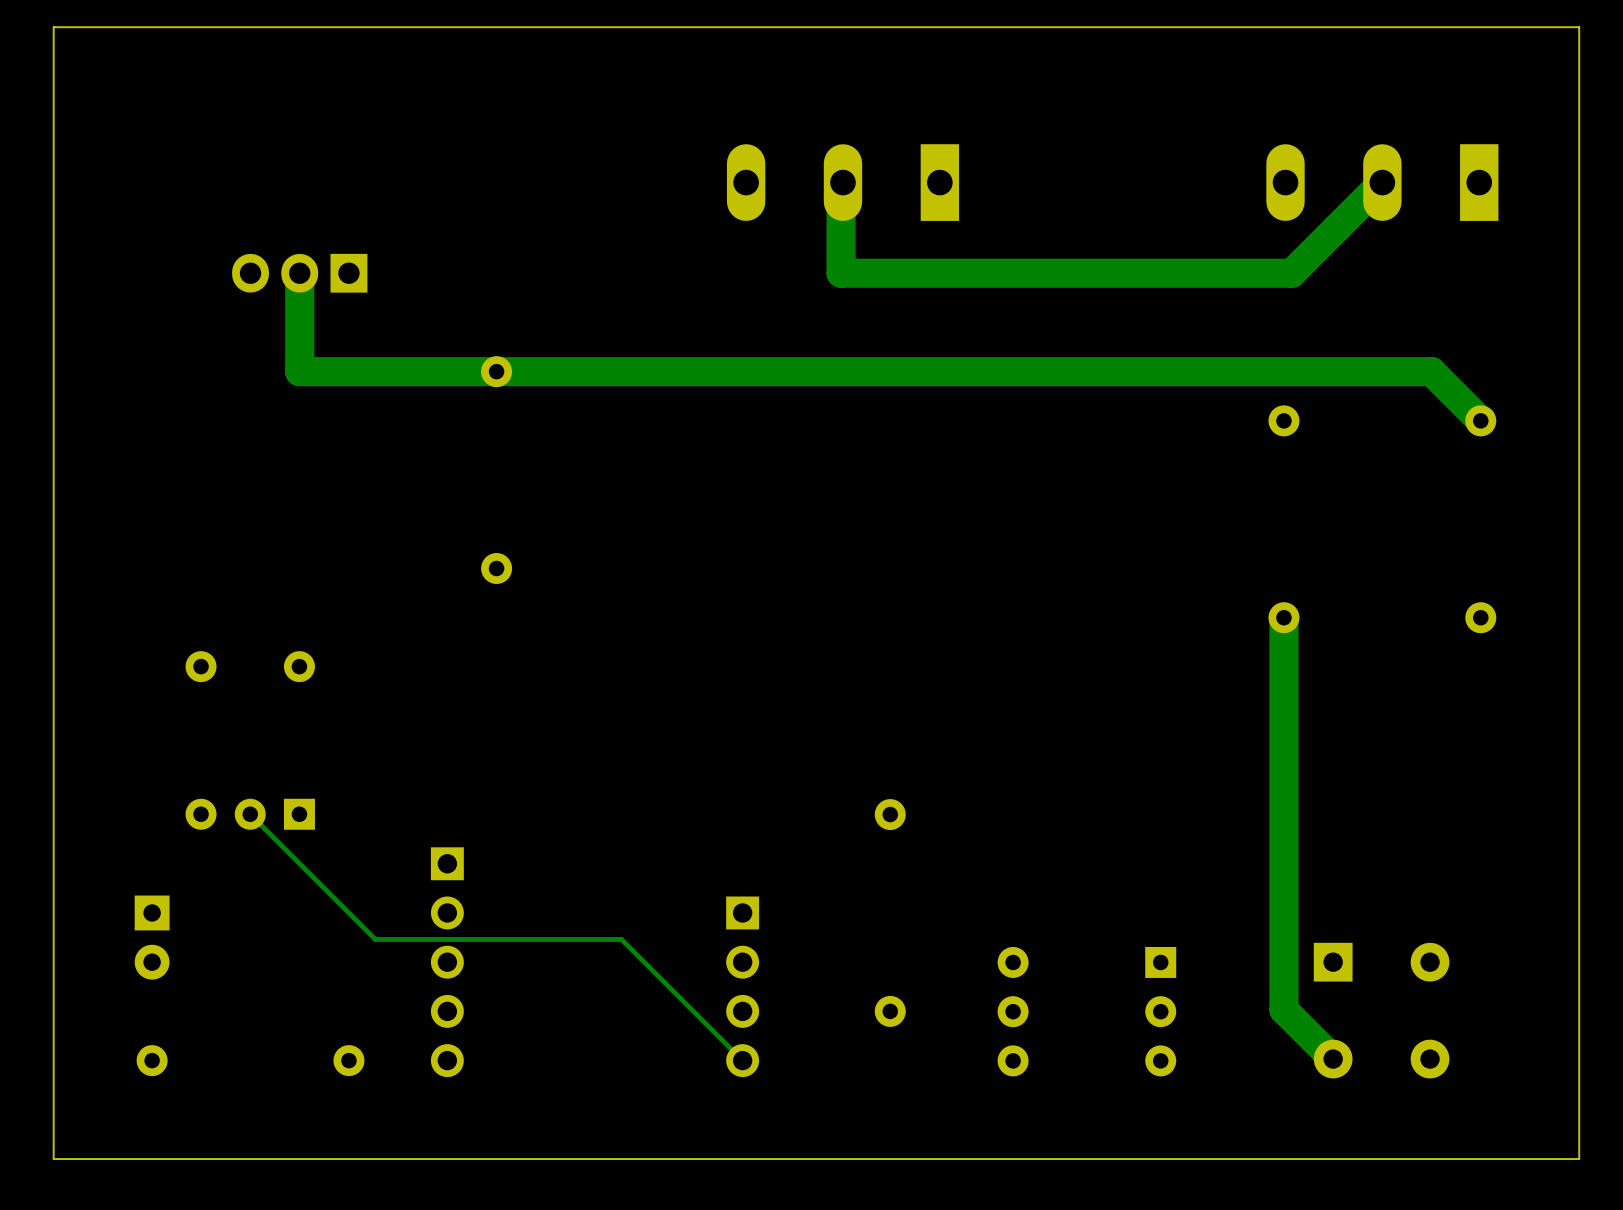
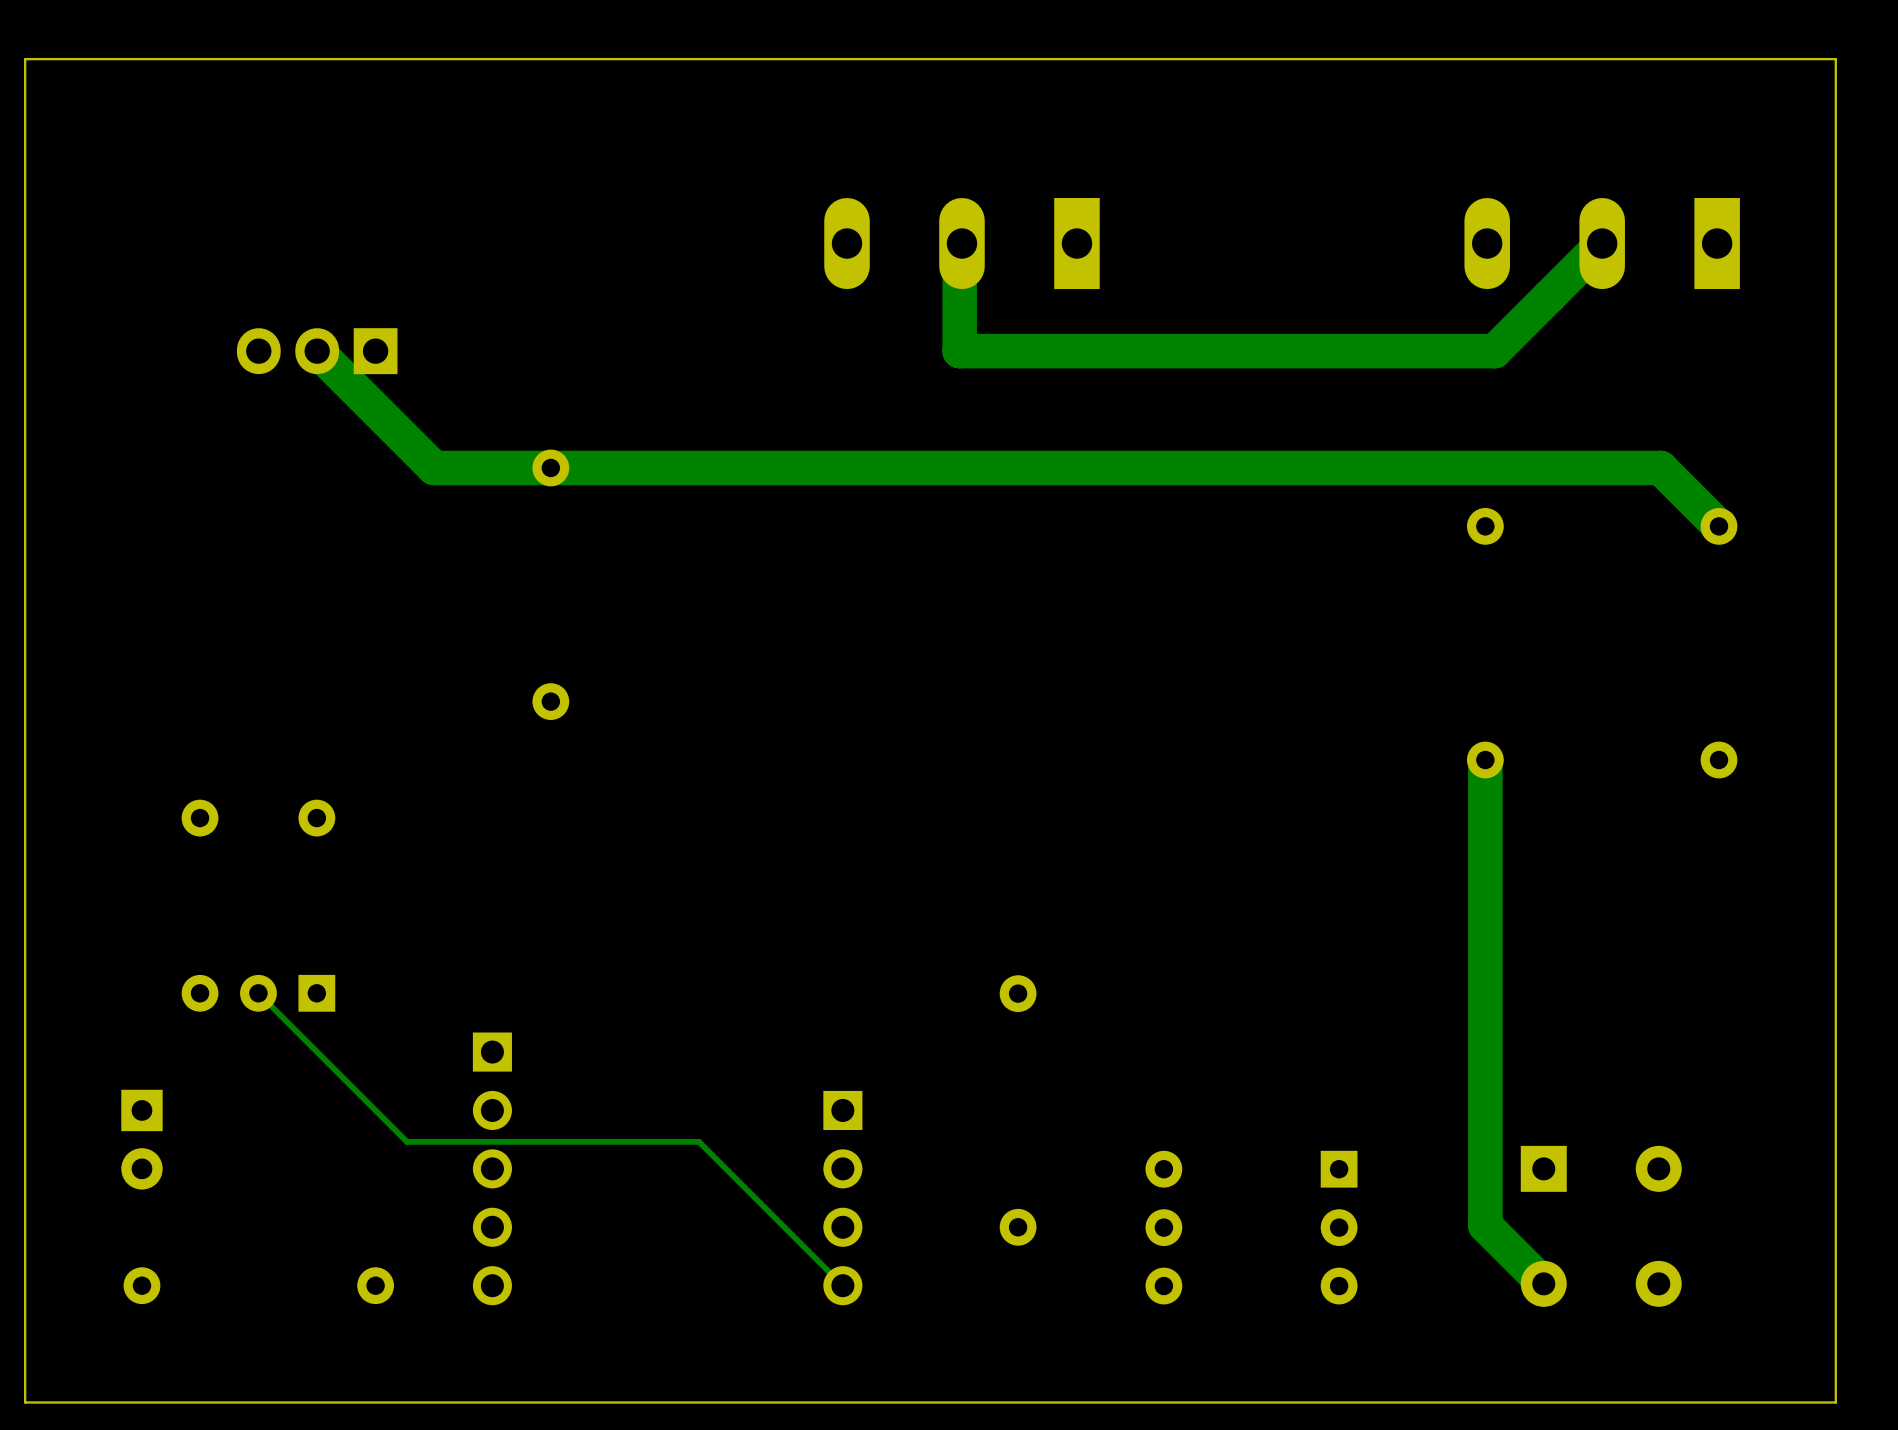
track: (299, 273) (299, 371) (398, 371) -> (317, 351) (434, 467)

